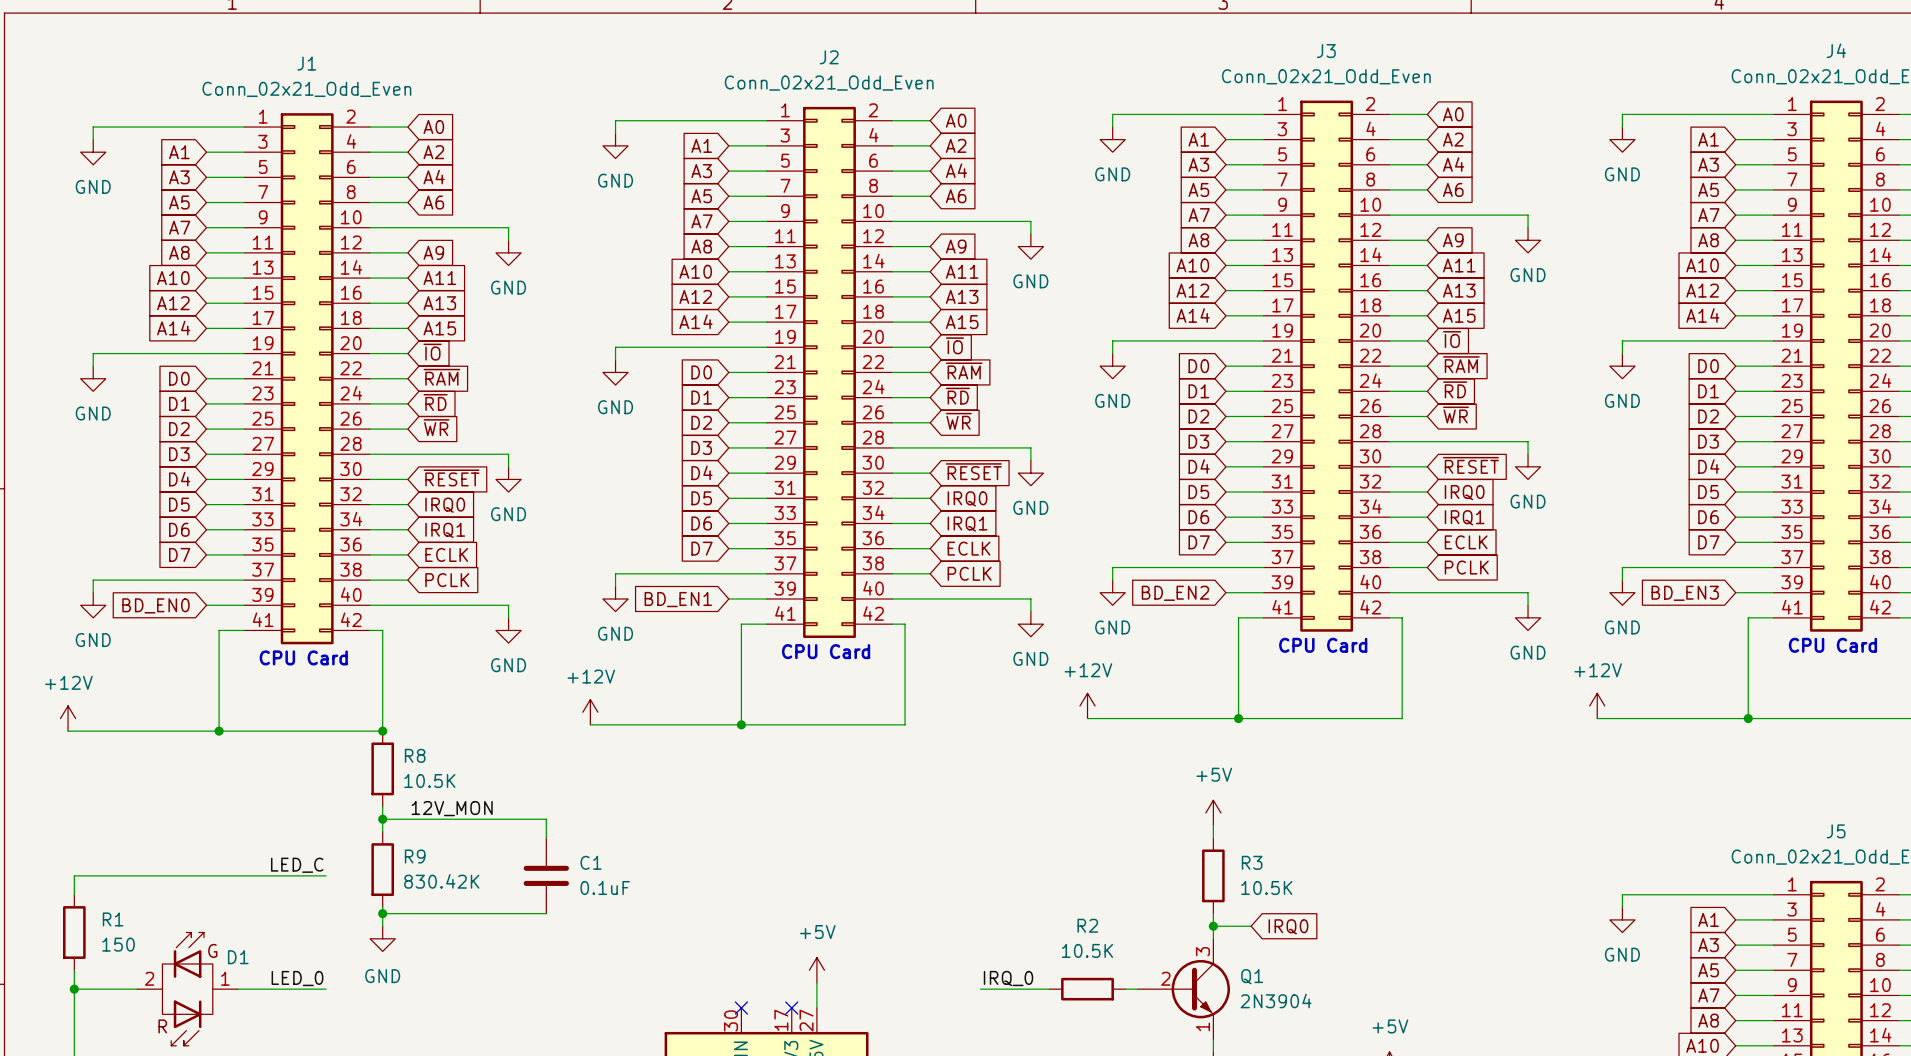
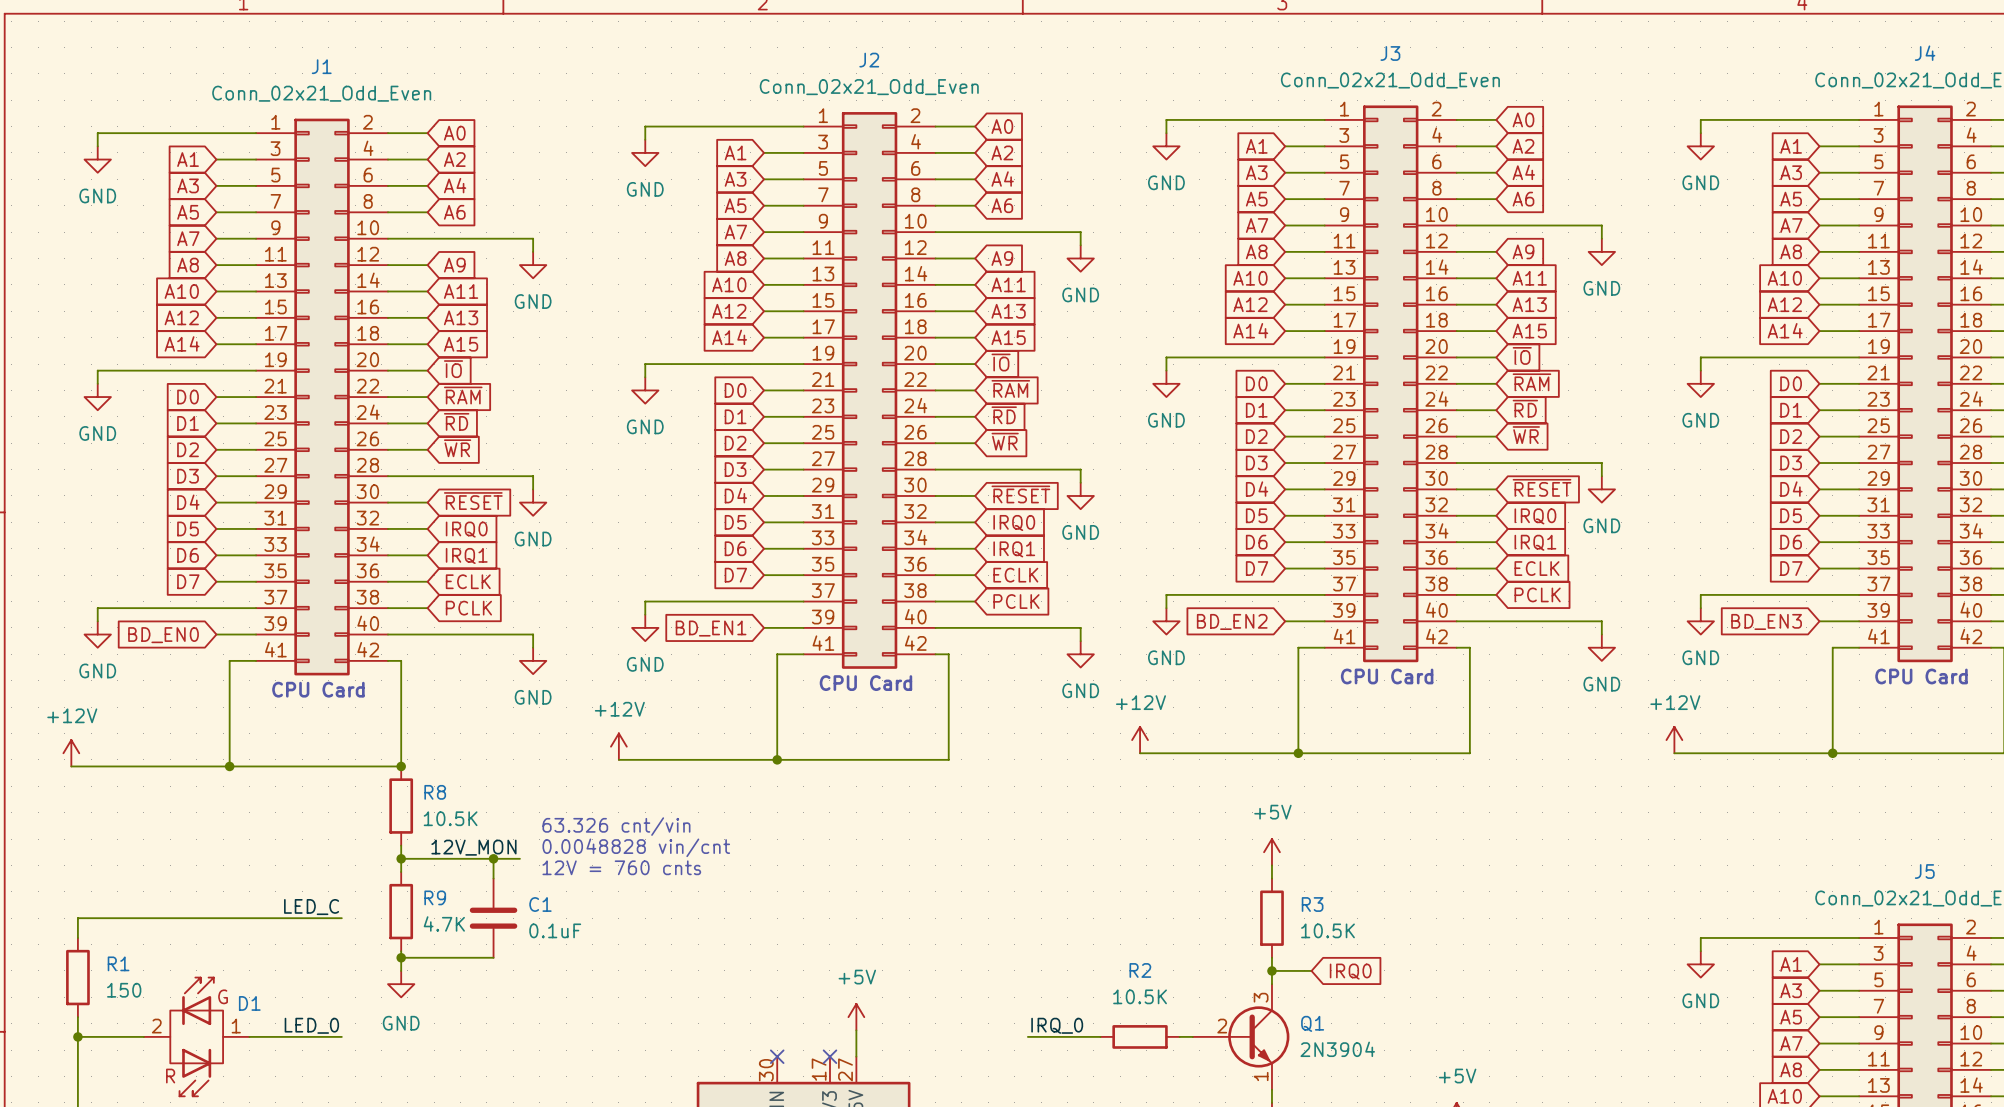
text: none -> 63.326 cnt/vin (616, 826)
text: none -> 0.0048828 vin/cnt (636, 847)
wire: none -> (493, 858) (493, 878)
junction: none -> (493, 858)
wire: (495, 819) (546, 819) (546, 838) -> none
text: none -> 12V = 760 cnts (621, 867)
C1 position: (546, 875) -> (493, 918)
R9 value: 830.42K (441, 881) -> 4.7K (444, 923)
wire: (470, 913) (546, 913) -> none

